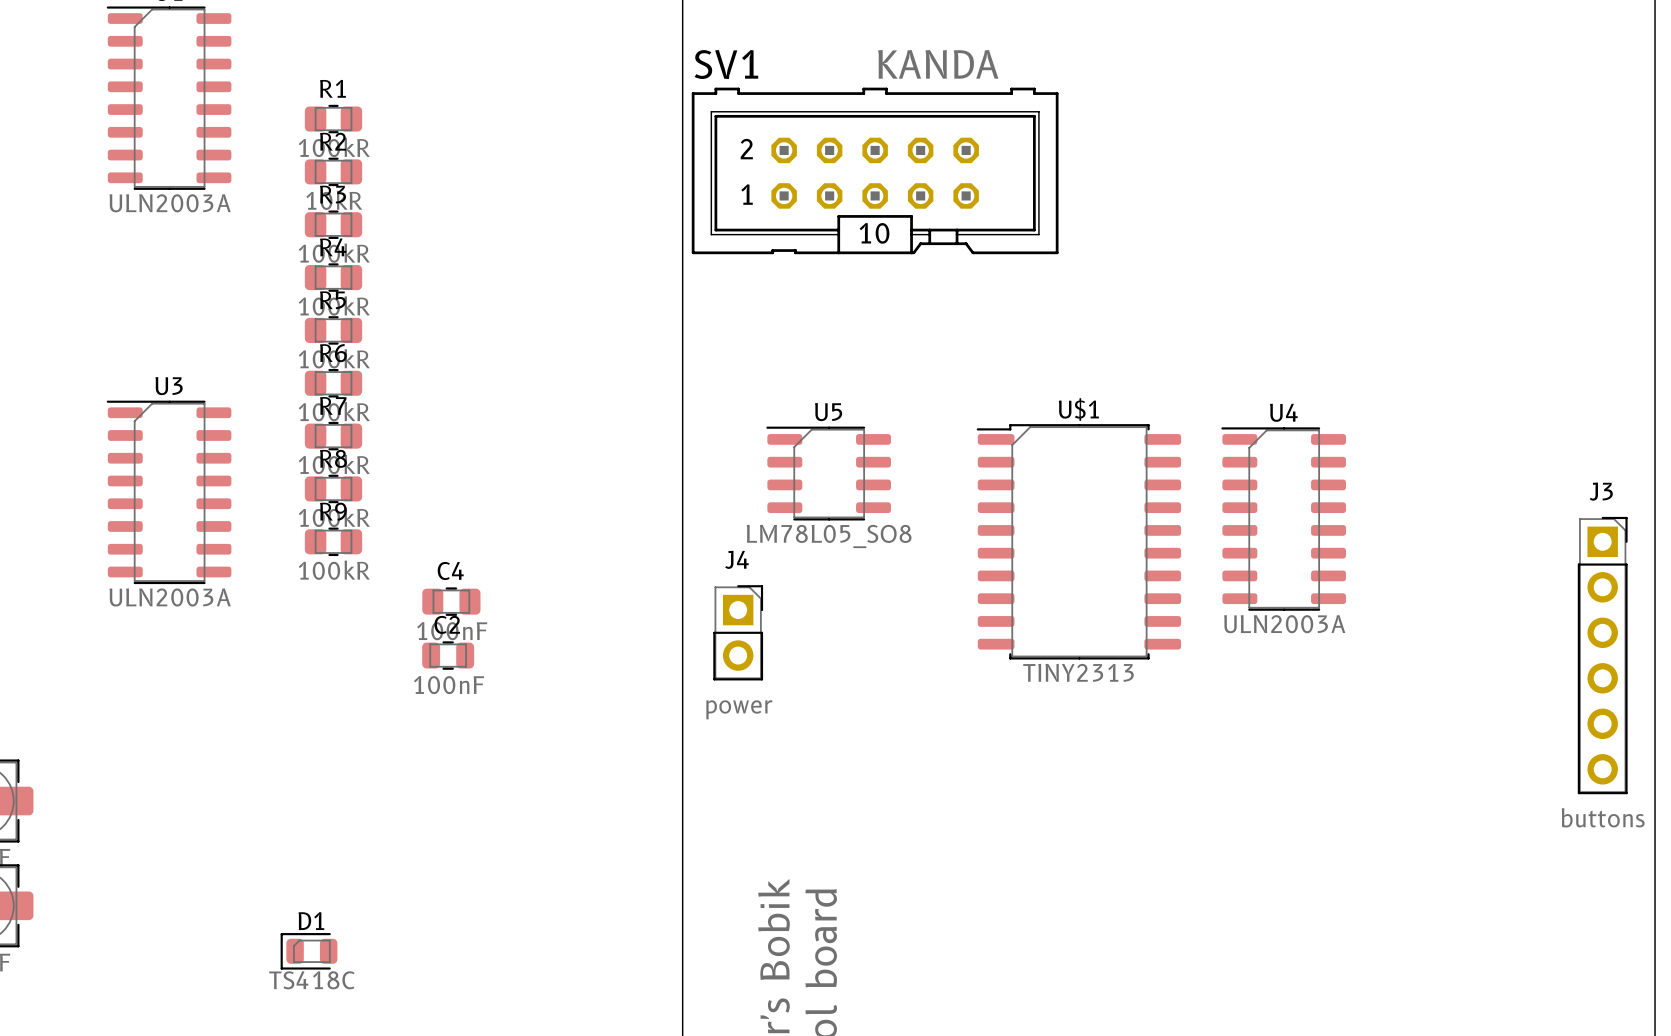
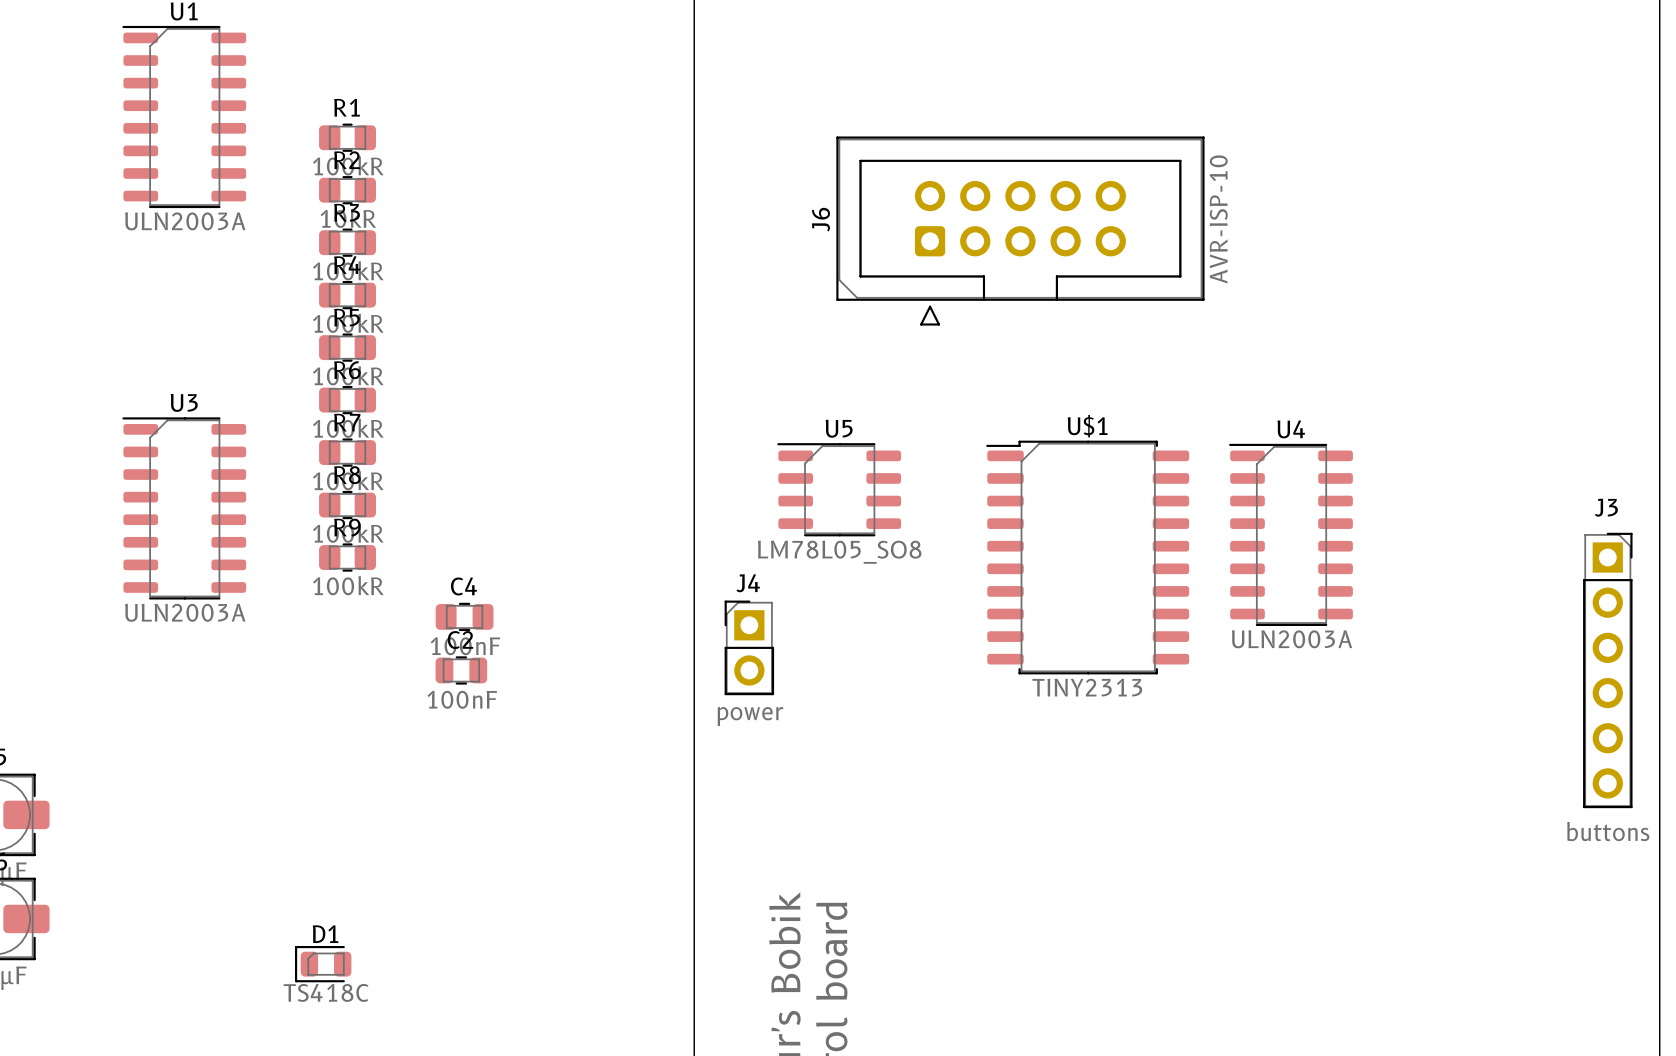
SV1: KANDA (875, 170) -> none
J6: none -> AVR-ISP-10 (1020, 231)
J4 footprint: [713, 585, 764, 681] -> [724, 600, 775, 696]

